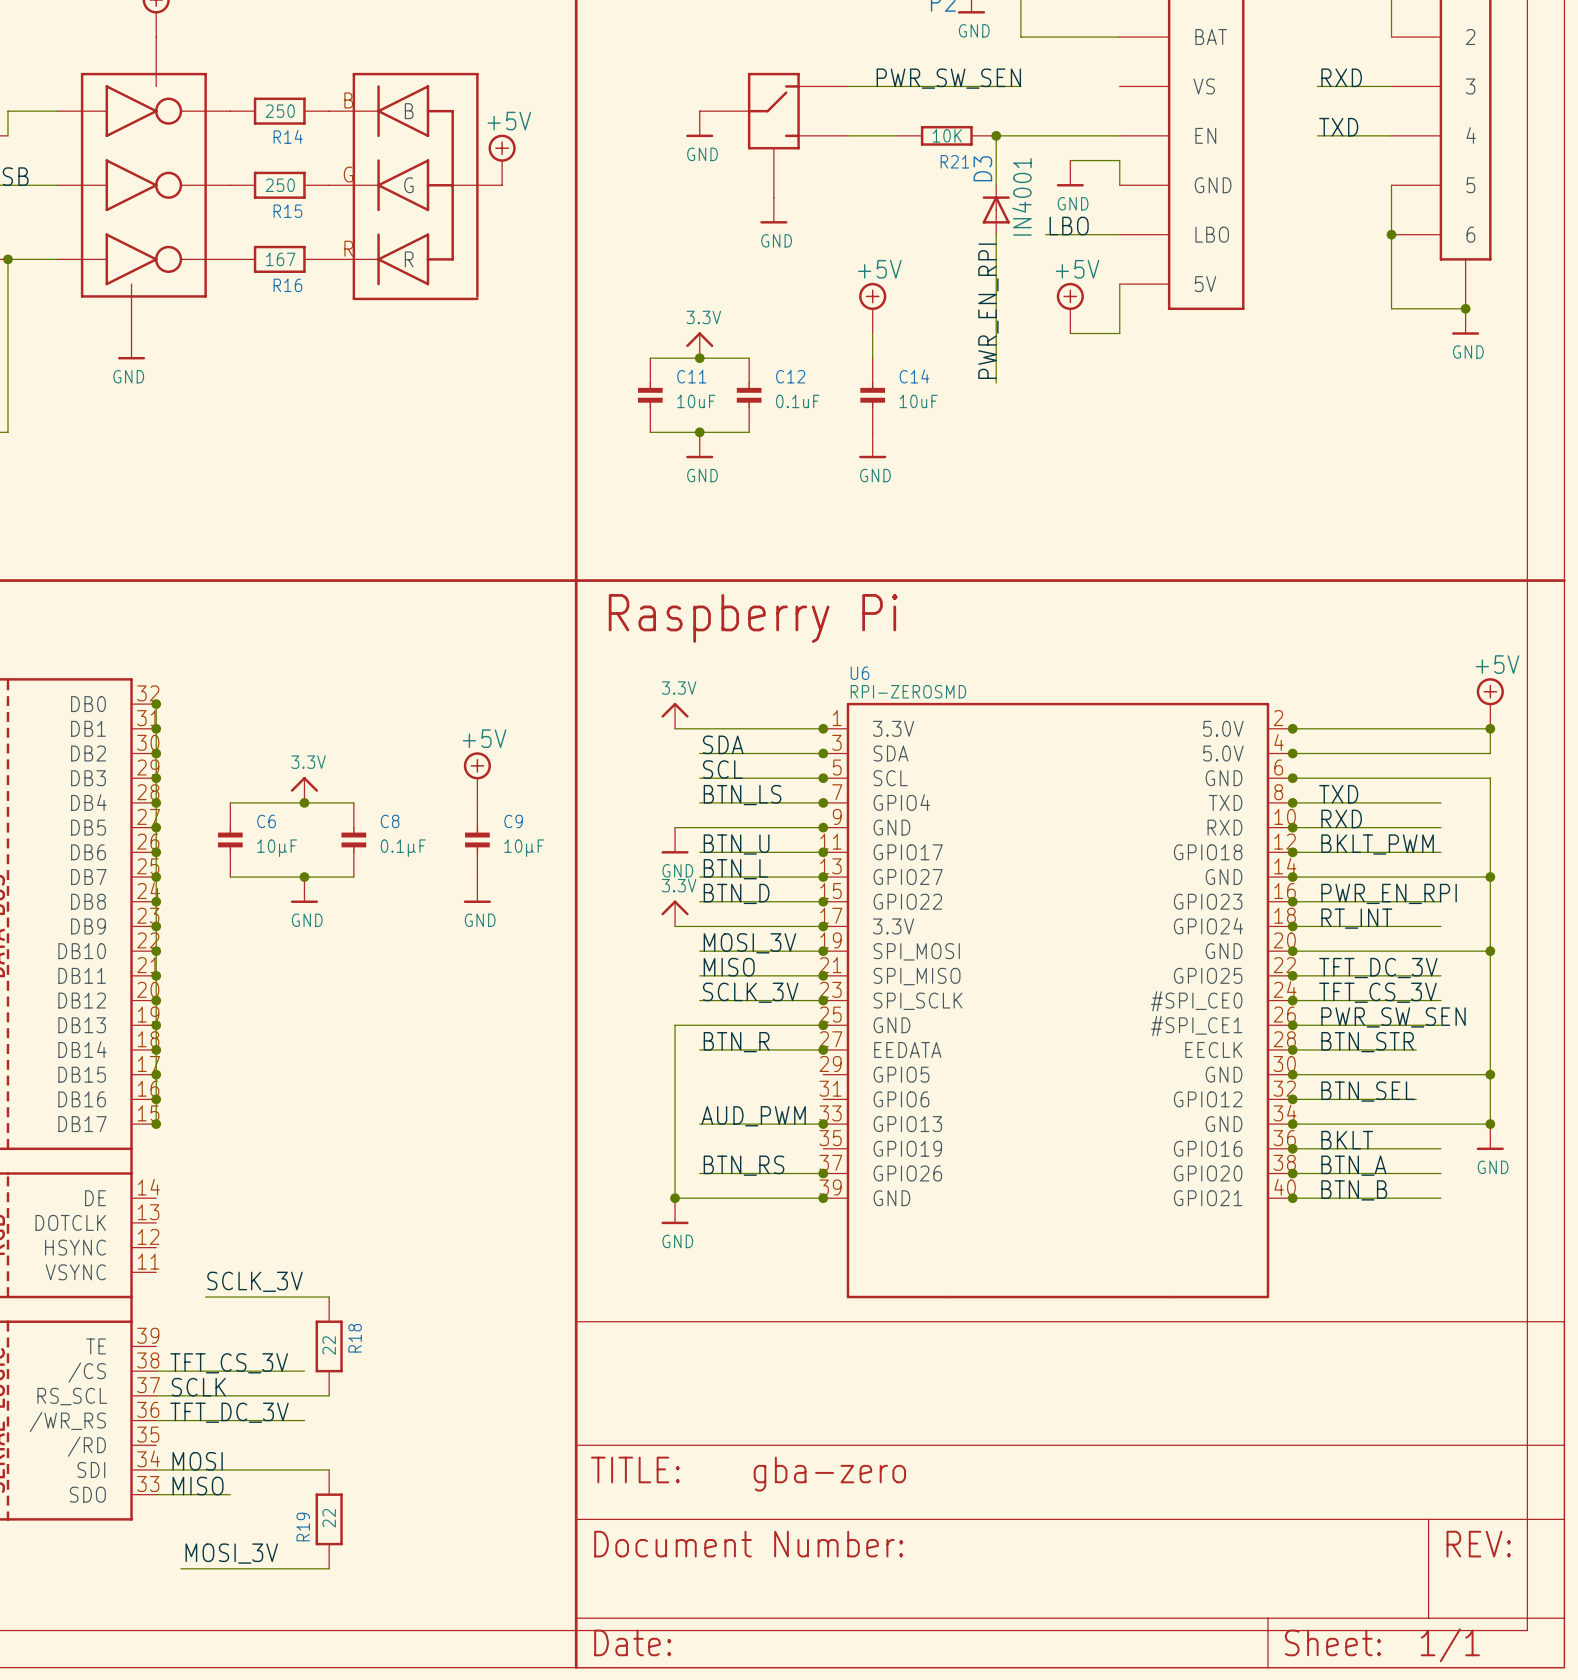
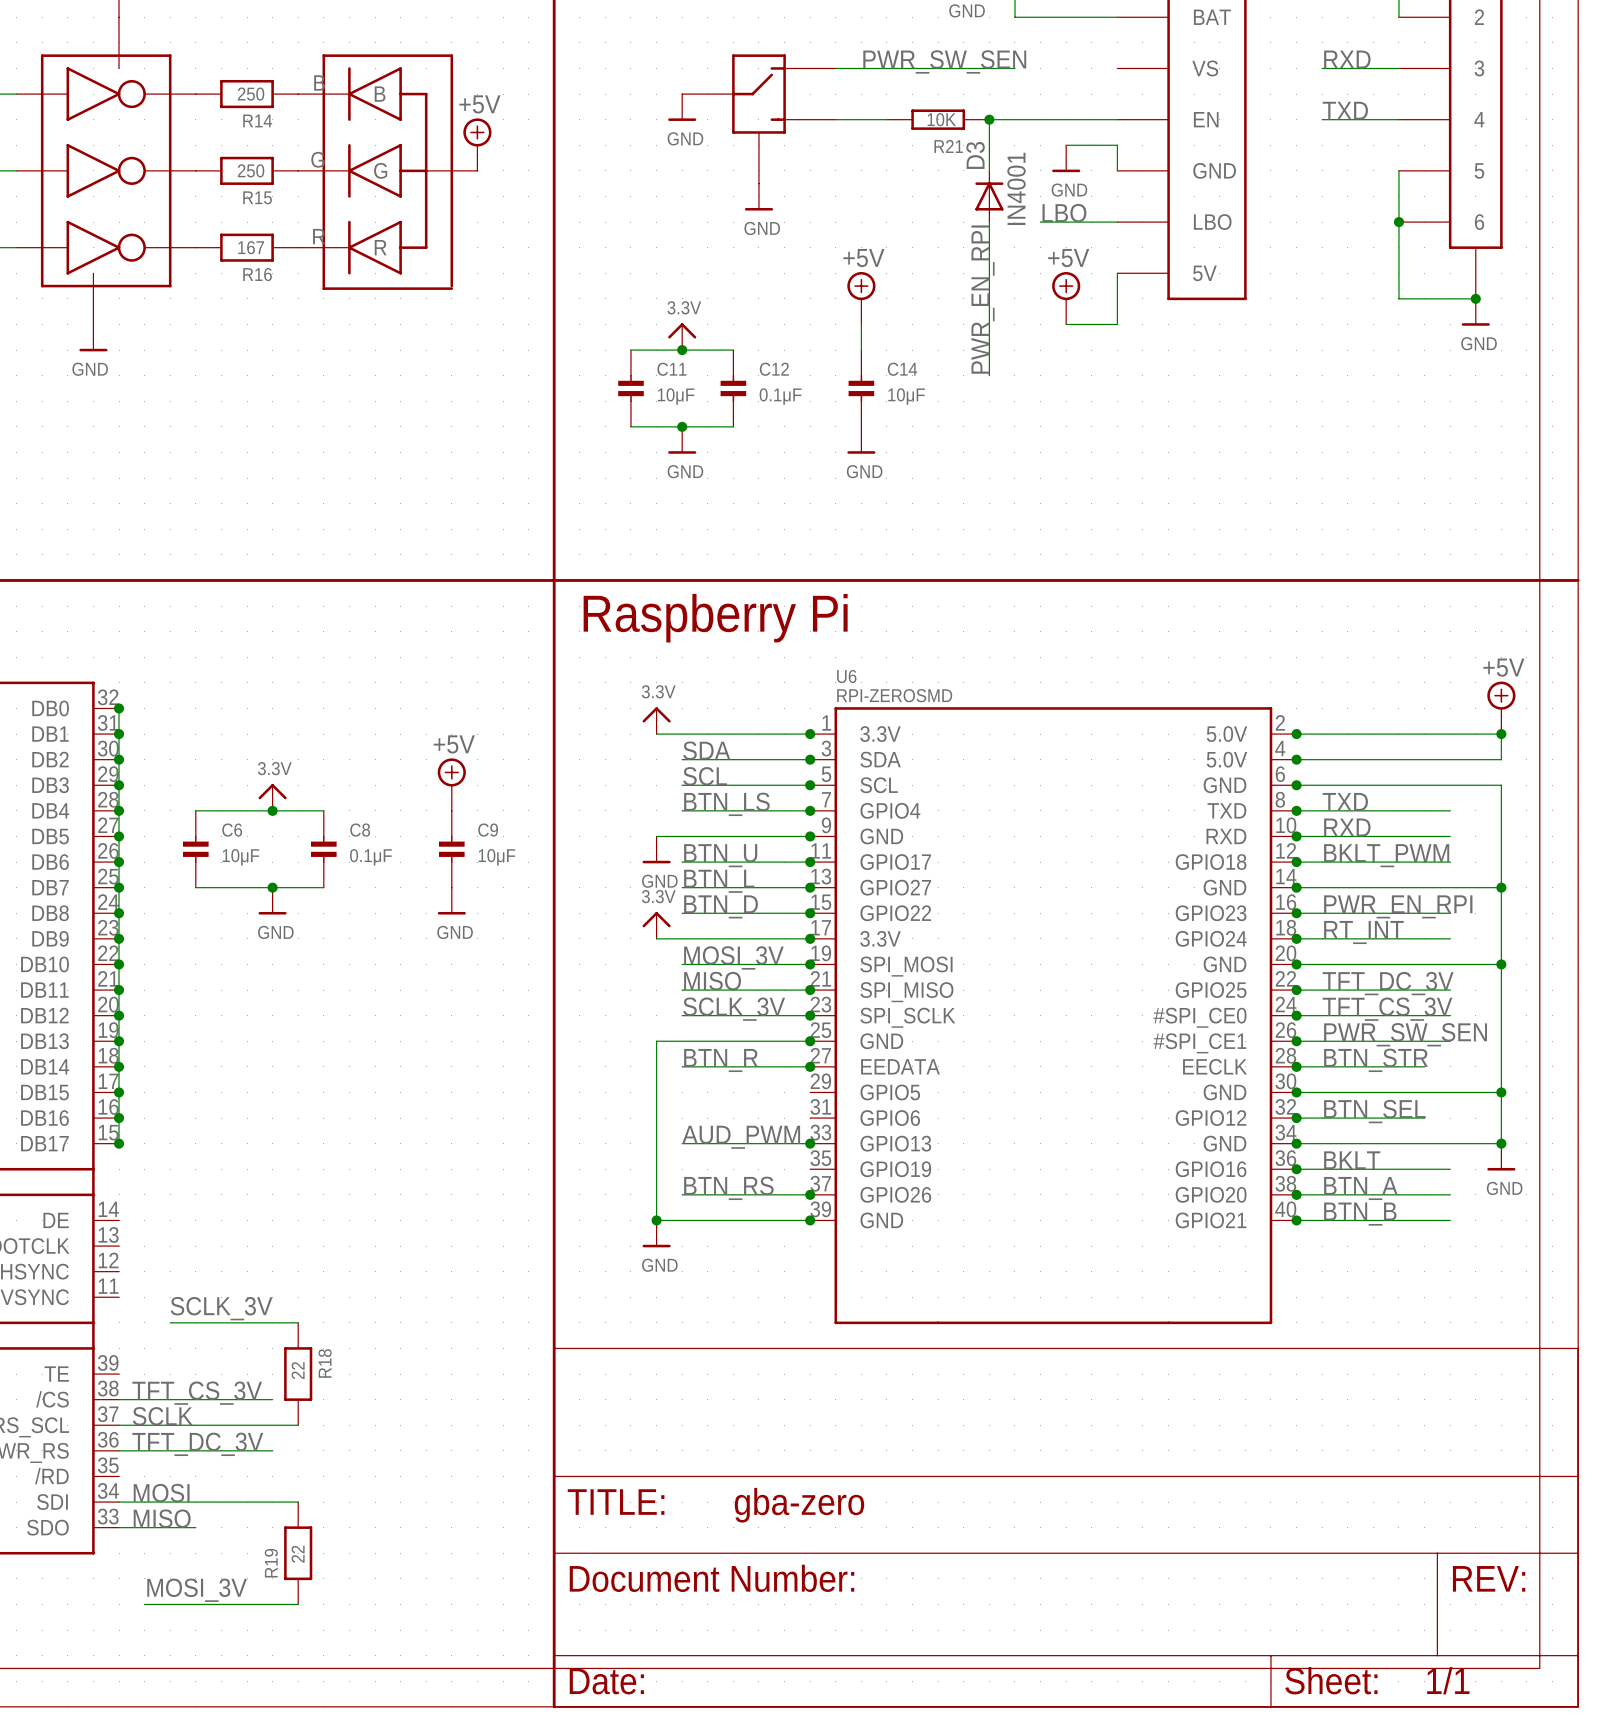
C11 value: 10uF (696, 401) -> 10μF (676, 396)
C12 value: 0.1uF (797, 401) -> 0.1μF (780, 396)
C14 value: 10uF (918, 401) -> 10μF (906, 396)

